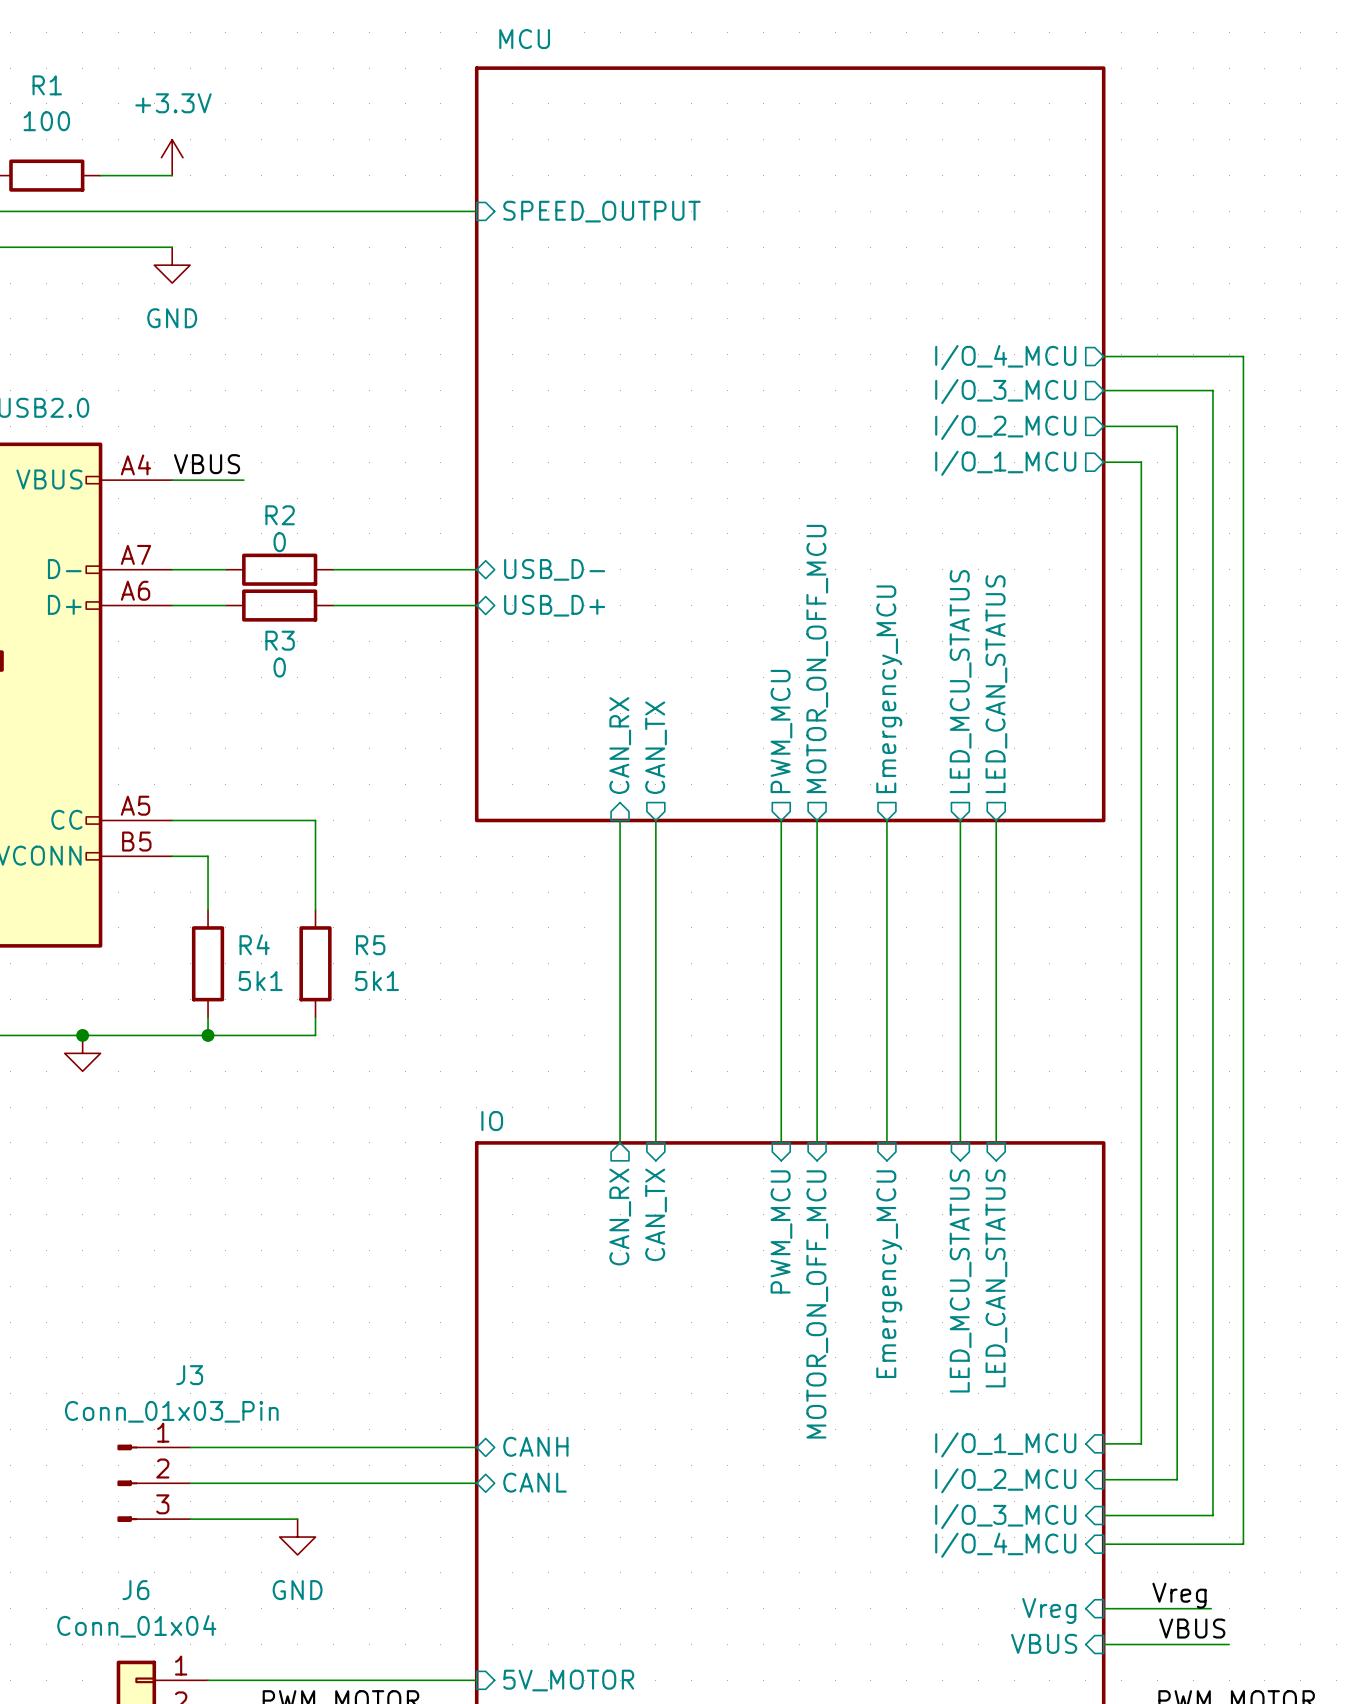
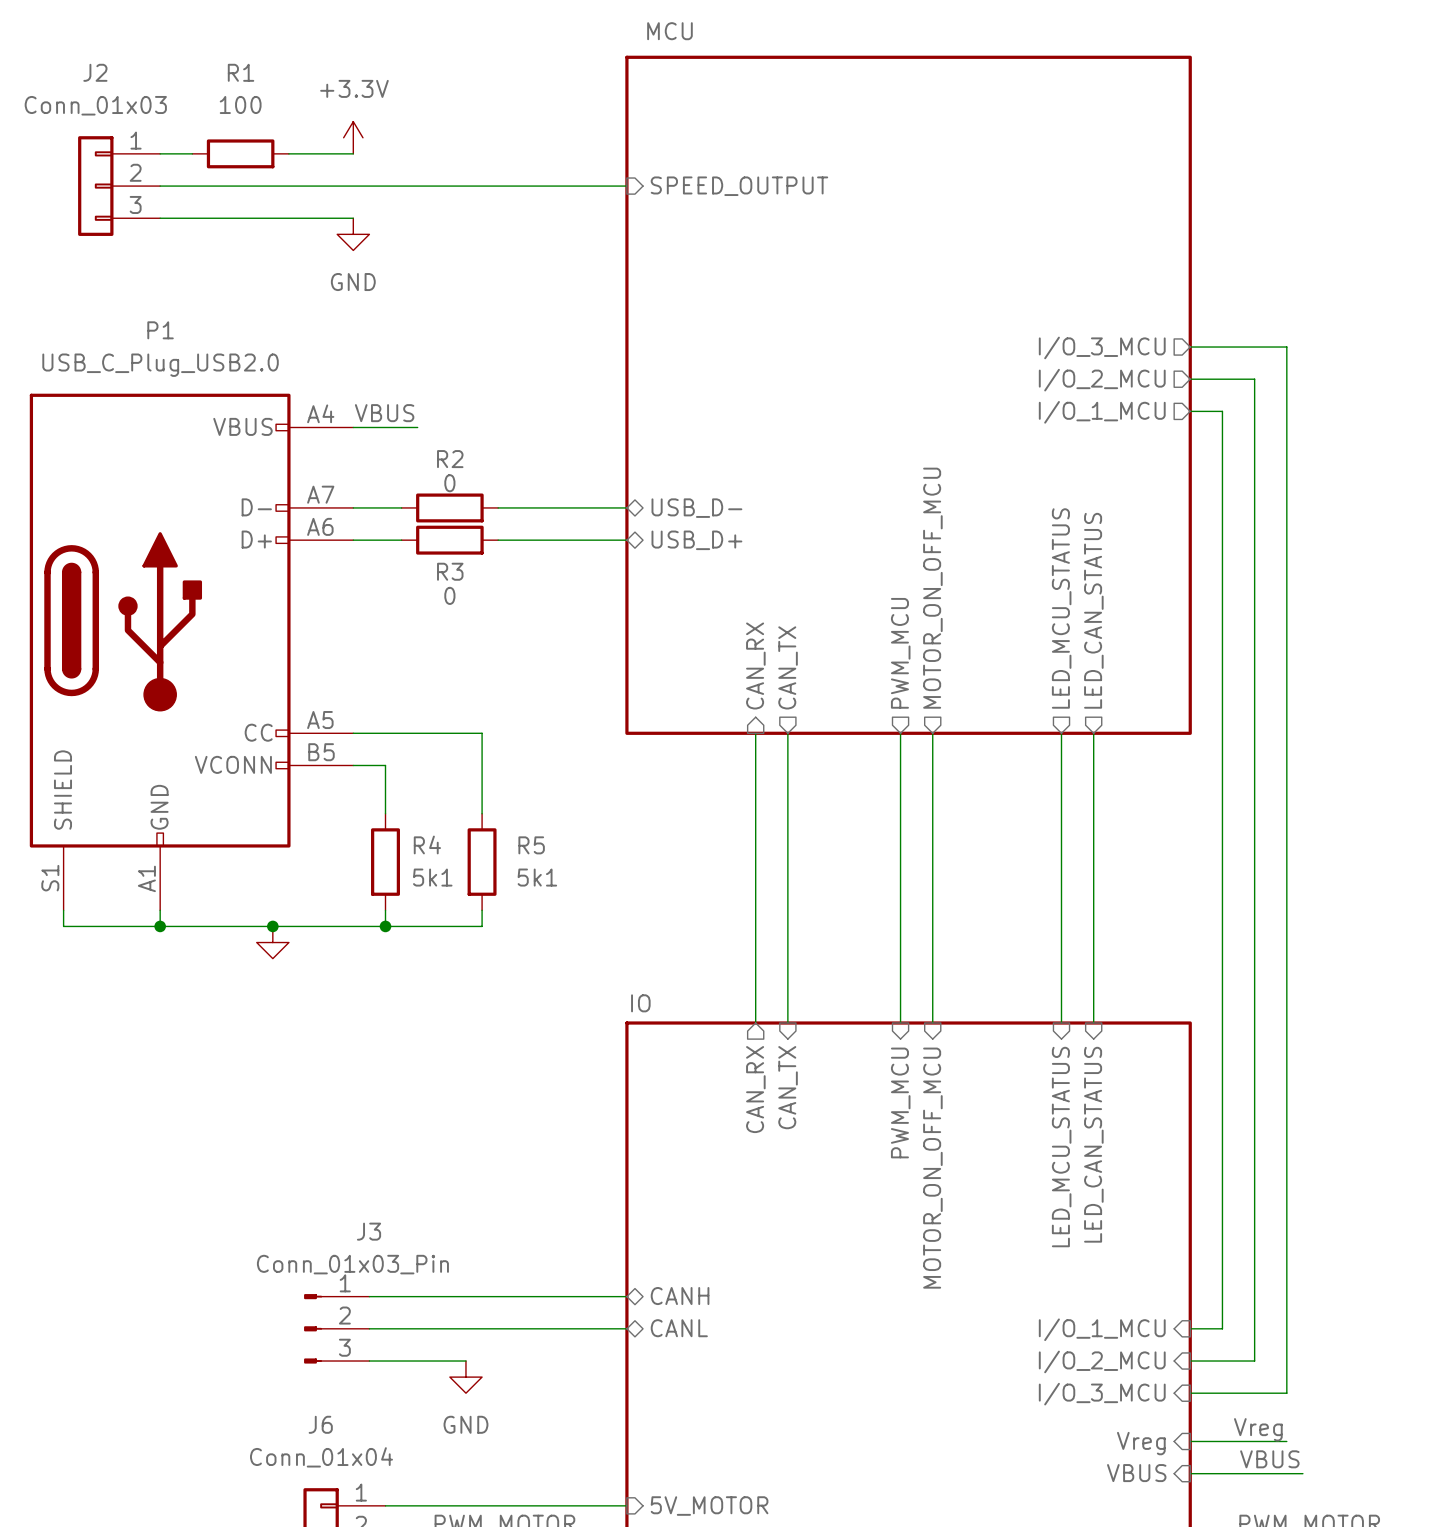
wire: (1103, 356) (1243, 356) (1243, 1544) (1103, 1544) -> none
sheet pin: I/O_4_MCU (1005, 357) -> none
wire: (1211, 390) (1212, 390) (1212, 1515) (1103, 1515) -> (1286, 347) (1286, 1393) (1190, 1393)
wire: (1175, 426) (1177, 426) (1177, 1479) (1103, 1479) -> (1254, 379) (1254, 1361) (1190, 1361)
wire: (1139, 462) (1141, 462) (1141, 1443) (1103, 1443) -> (1222, 411) (1222, 1328) (1190, 1328)
sheet pin: Emergency_MCU (889, 689) -> none
wire: (886, 820) (886, 1142) -> none
sheet pin: Emergency_MCU (889, 1274) -> none
sheet pin: I/O_1_MCU (1005, 1444) -> none
sheet pin: I/O_2_MCU (1005, 1480) -> I/O_1_MCU (1102, 1329)
sheet pin: I/O_3_MCU (1005, 1516) -> I/O_2_MCU (1102, 1361)
sheet pin: I/O_4_MCU (1005, 1545) -> I/O_3_MCU (1102, 1394)

